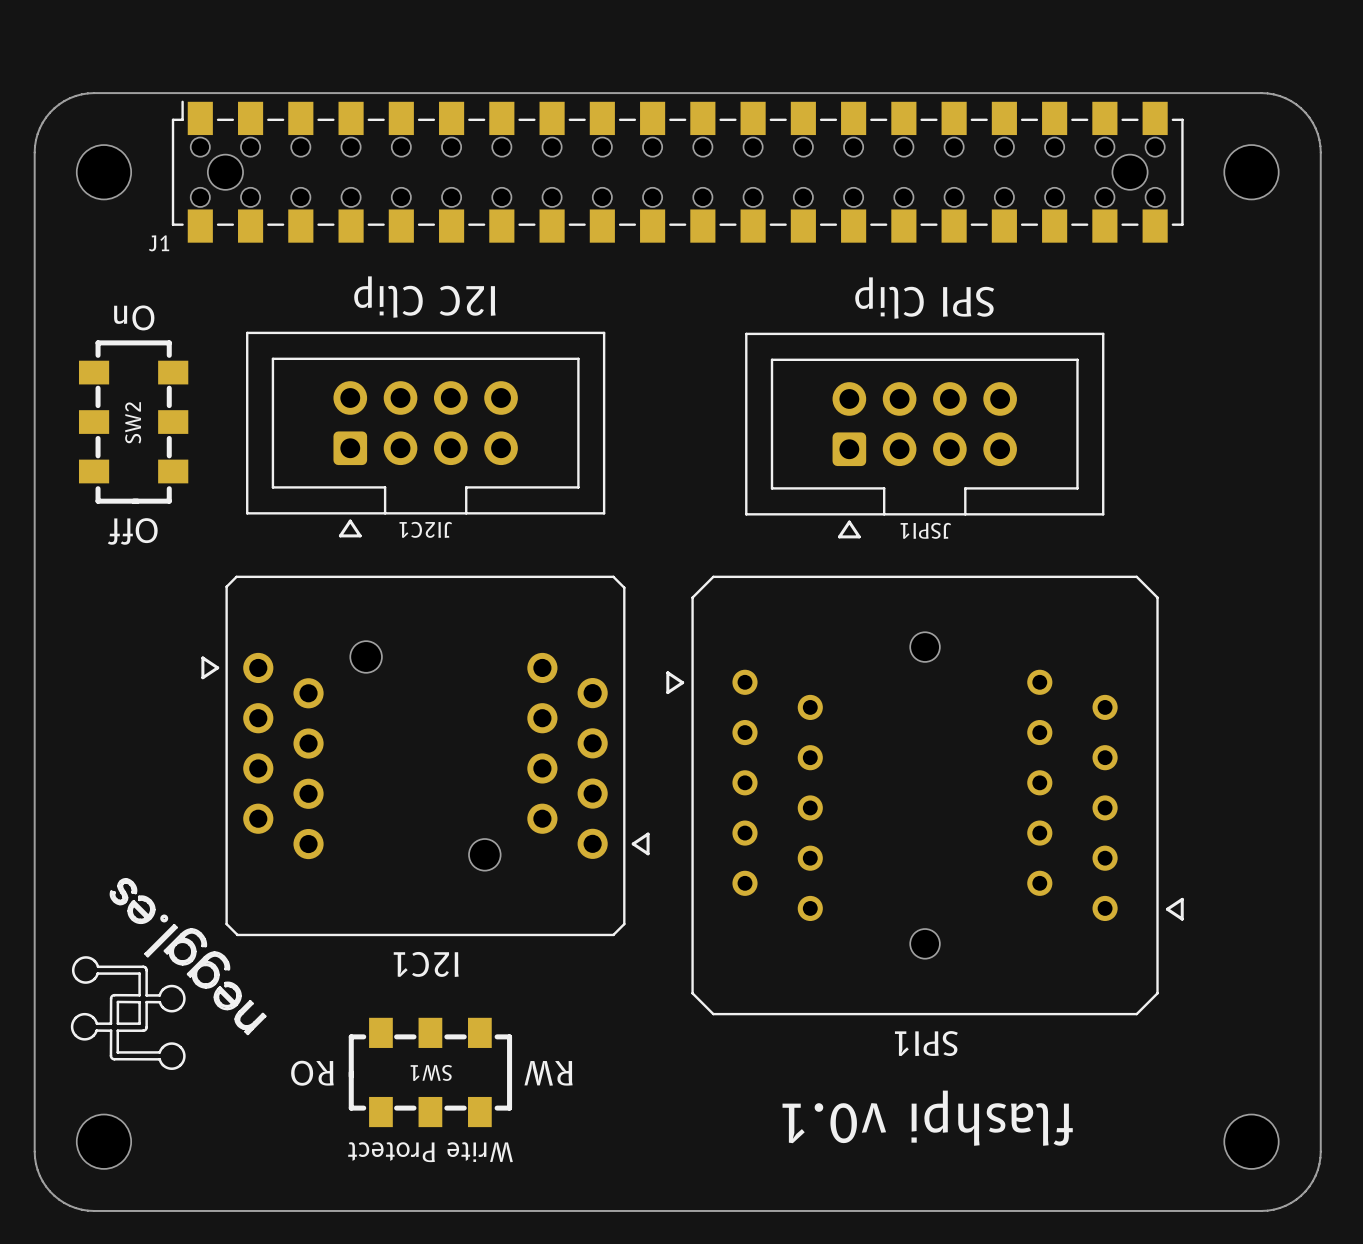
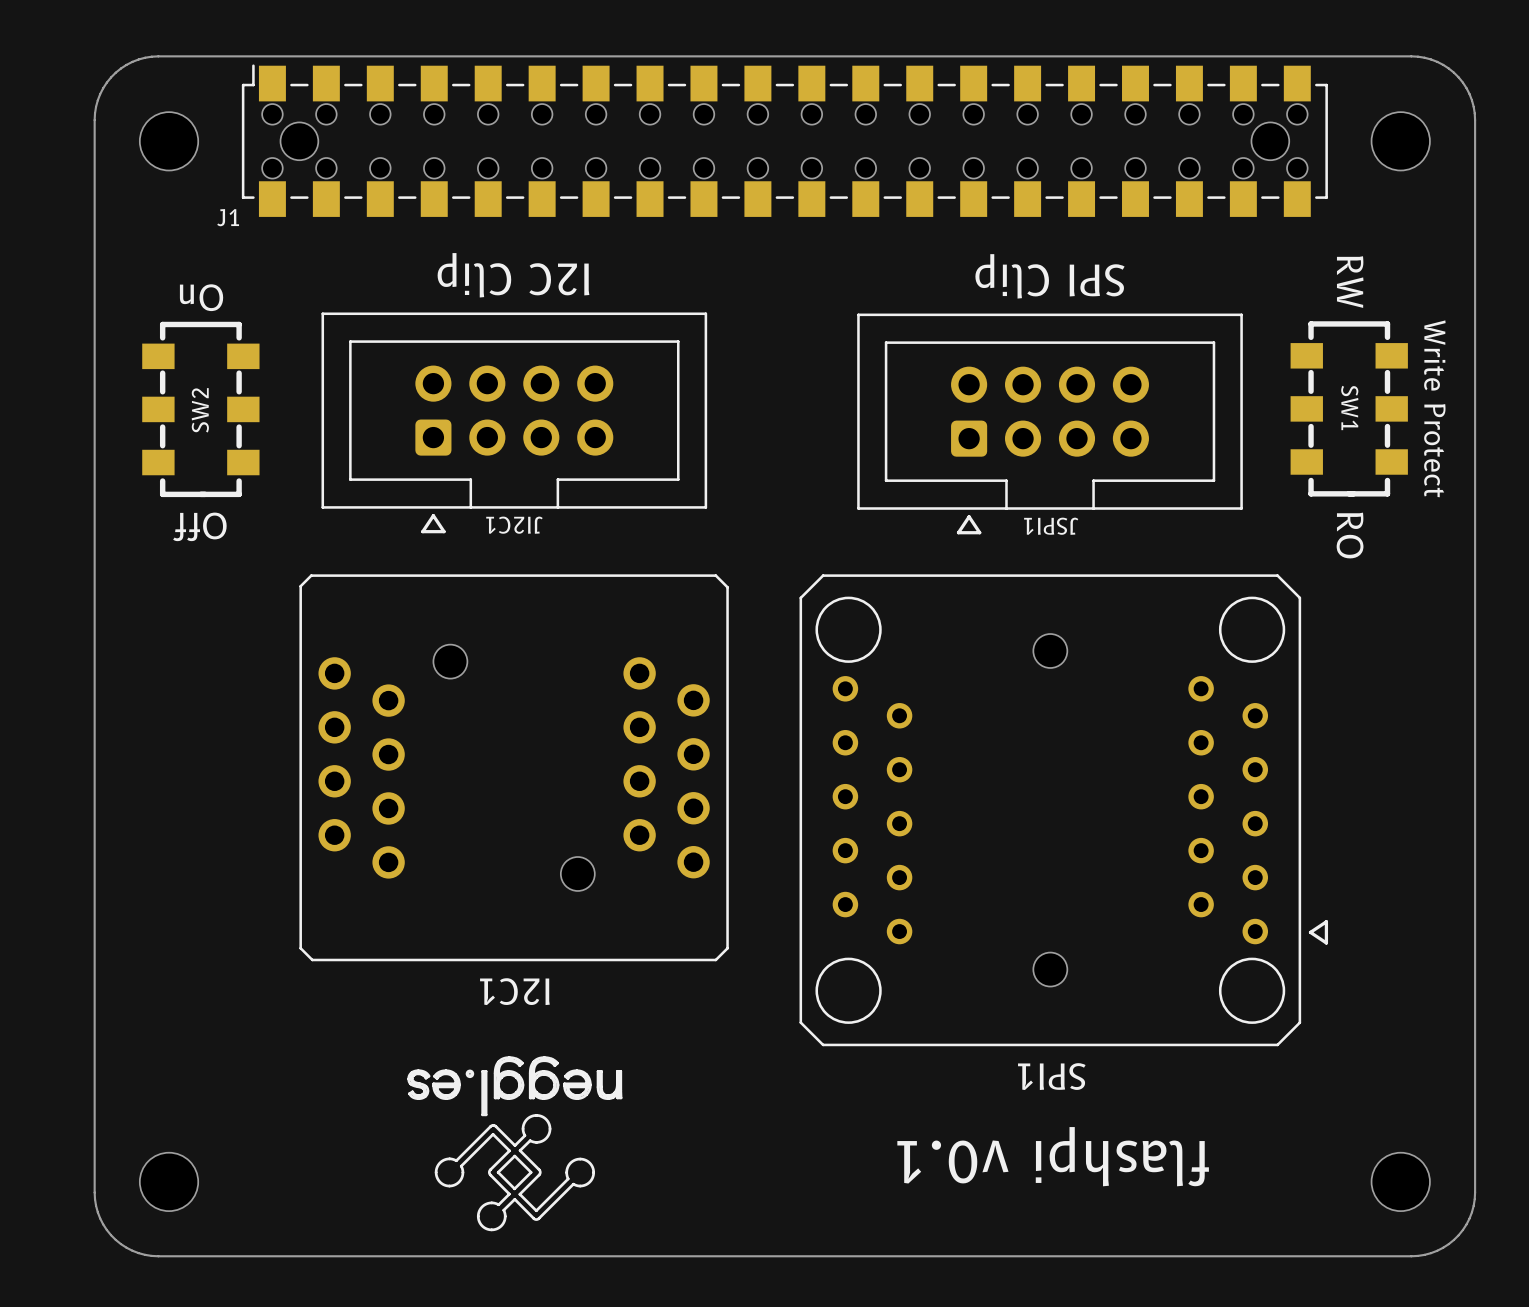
I2C1 footprint: [201, 575, 650, 937] -> [299, 574, 729, 962]
SPI1 footprint: [666, 575, 1184, 1016] -> [799, 574, 1329, 1047]
drawing: [70, 878, 267, 1070] -> none
drawing: none -> [407, 1056, 623, 1232]
SW1 rotation: 0° (430, 1072) -> 90° counterclockwise (1349, 408)
SW1 position: (430, 1072) -> (1349, 408)

